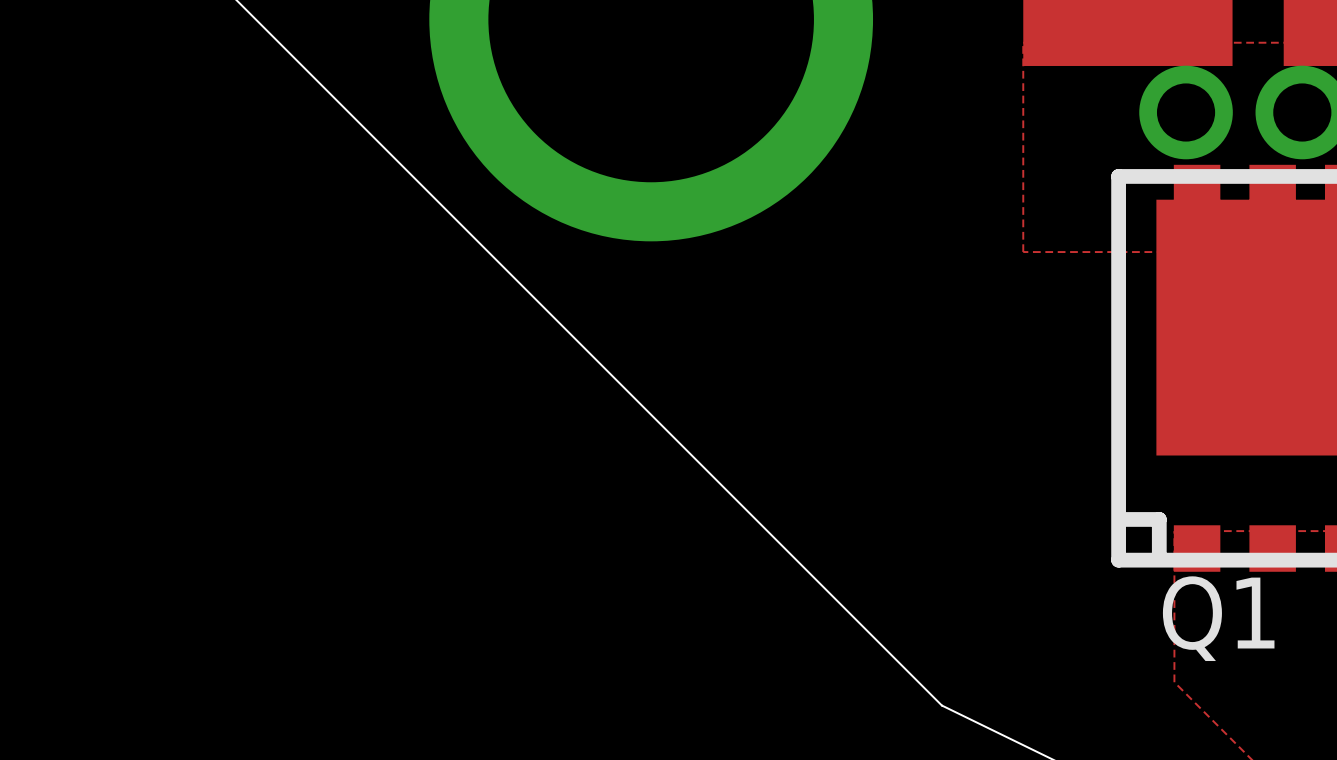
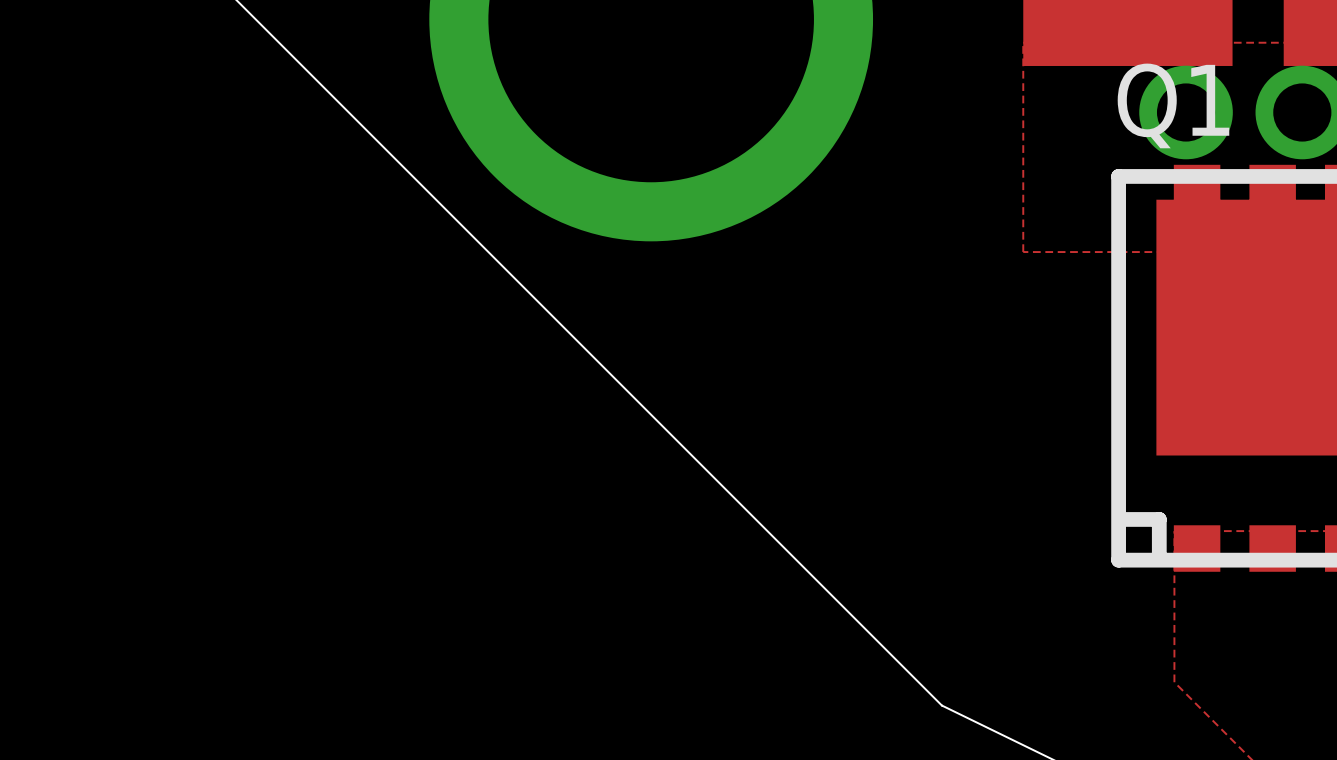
Q1 name position: Q1 (1218, 618) -> Q1 (1173, 105)

